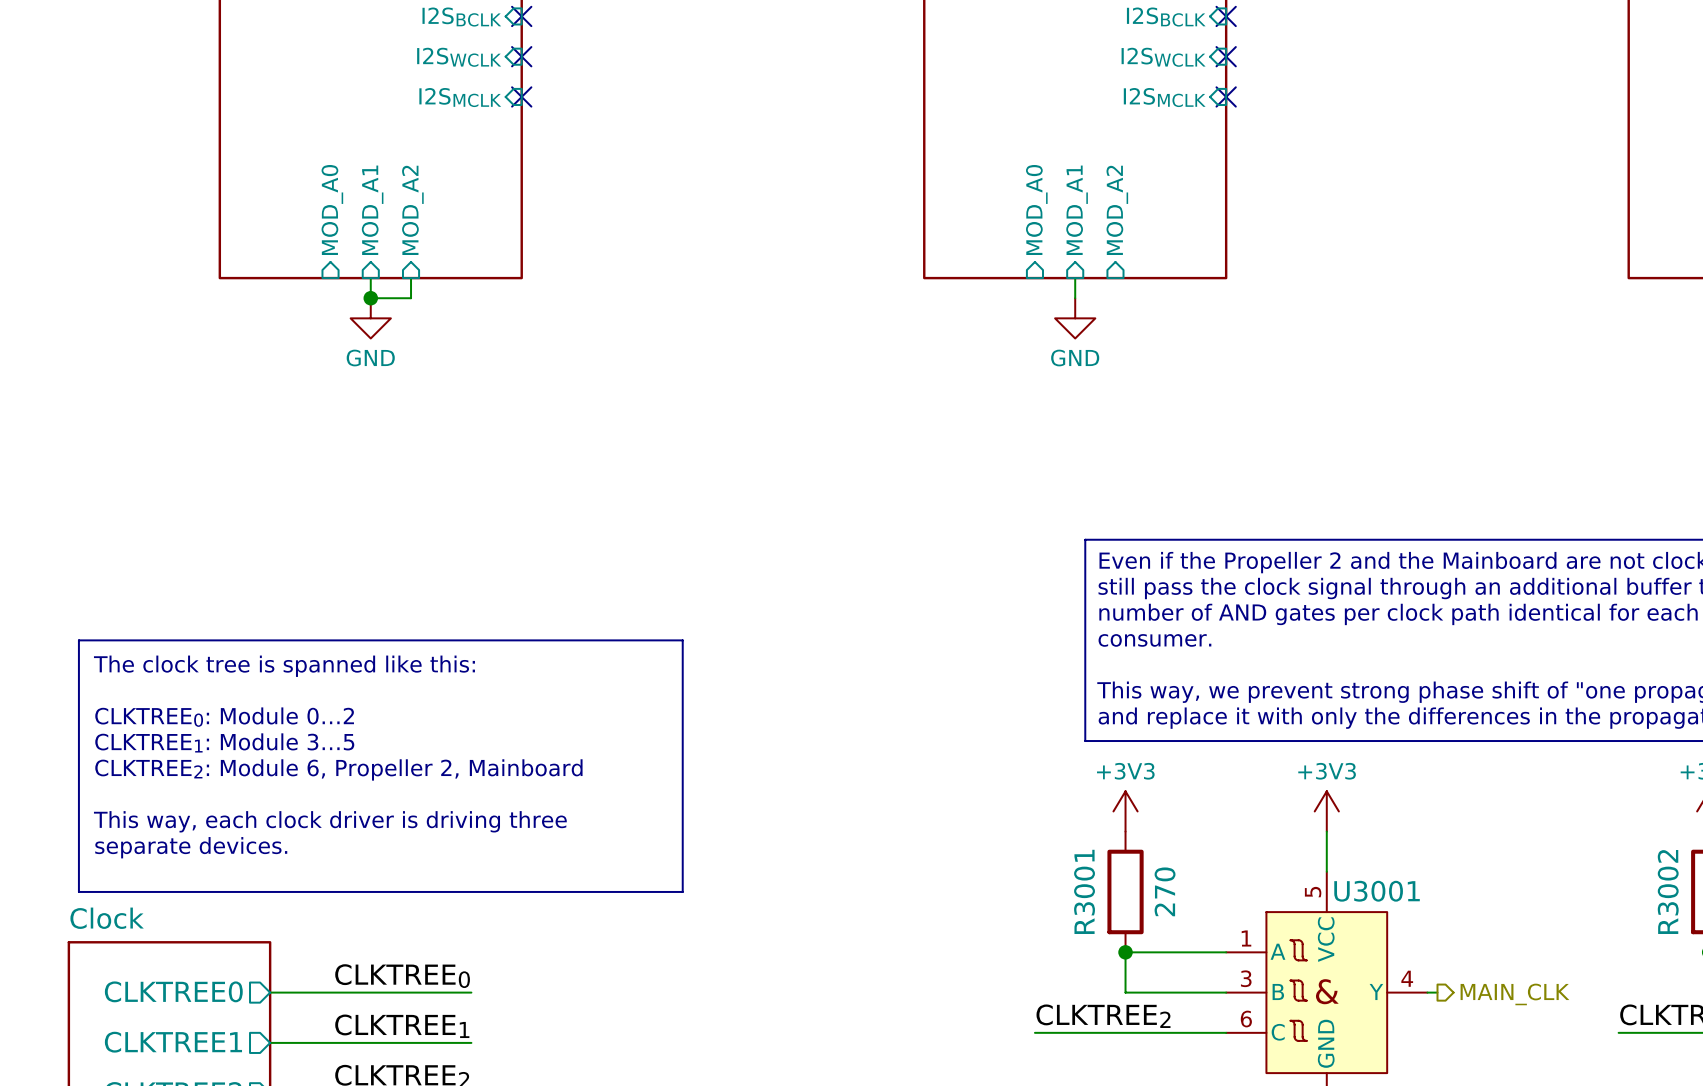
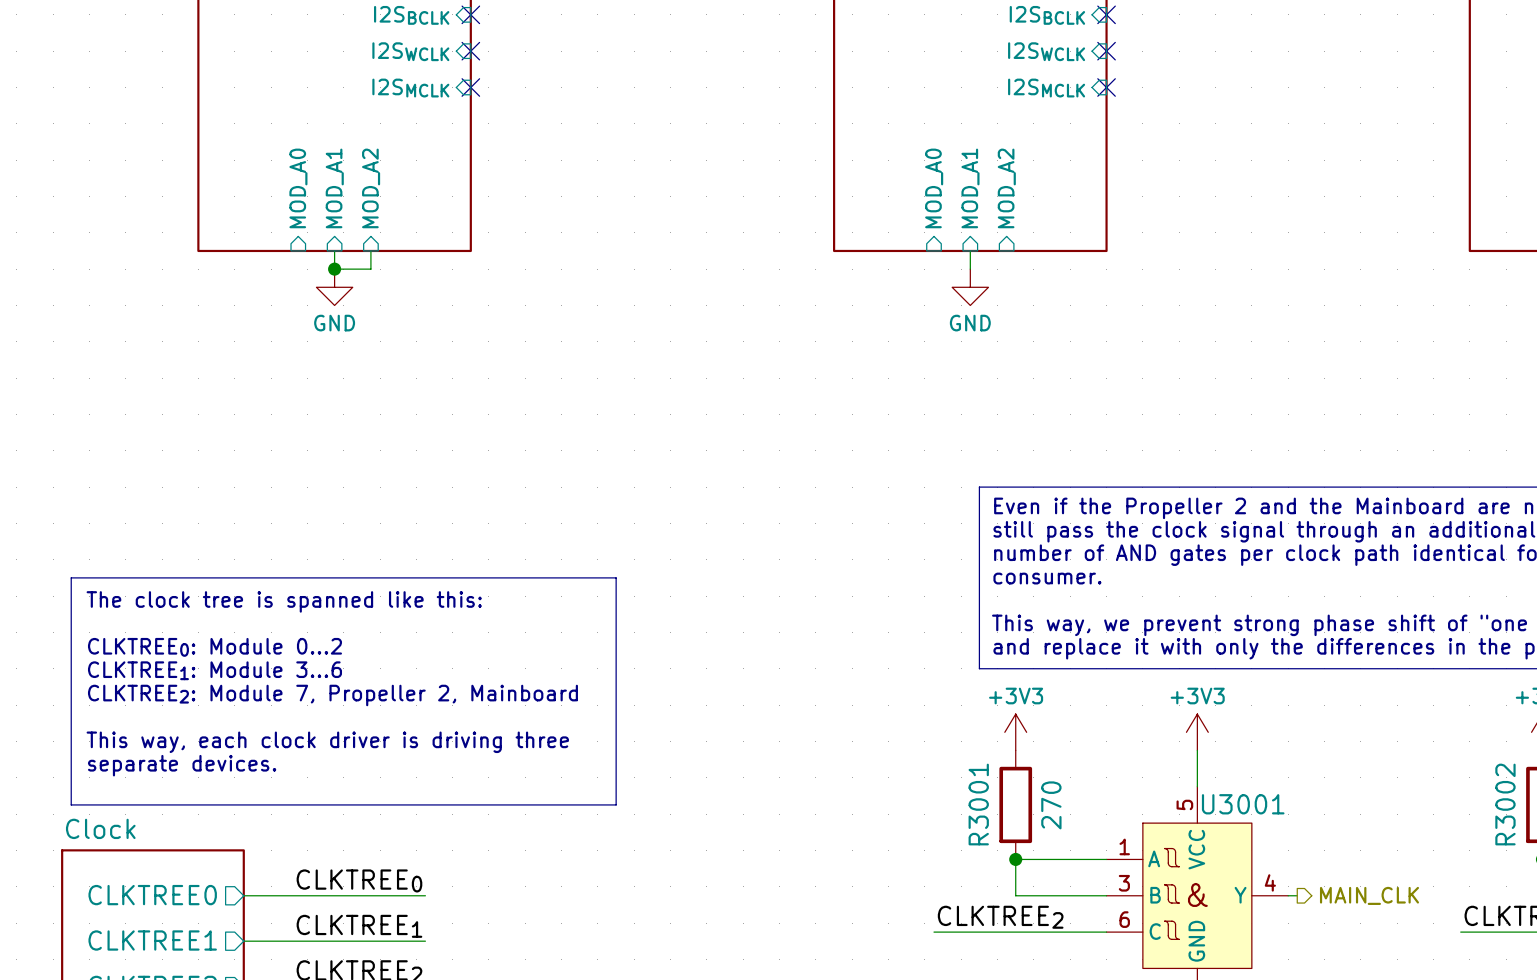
text: CLKTREE1: Module 3…5 (224, 742) -> CLKTREE1: Module 3…6 (214, 670)
text: CLKTREE2: Module 6, Propeller 2, Mainboard (338, 769) -> CLKTREE2: Module 7, Propeller 2, Mainboard (332, 695)

